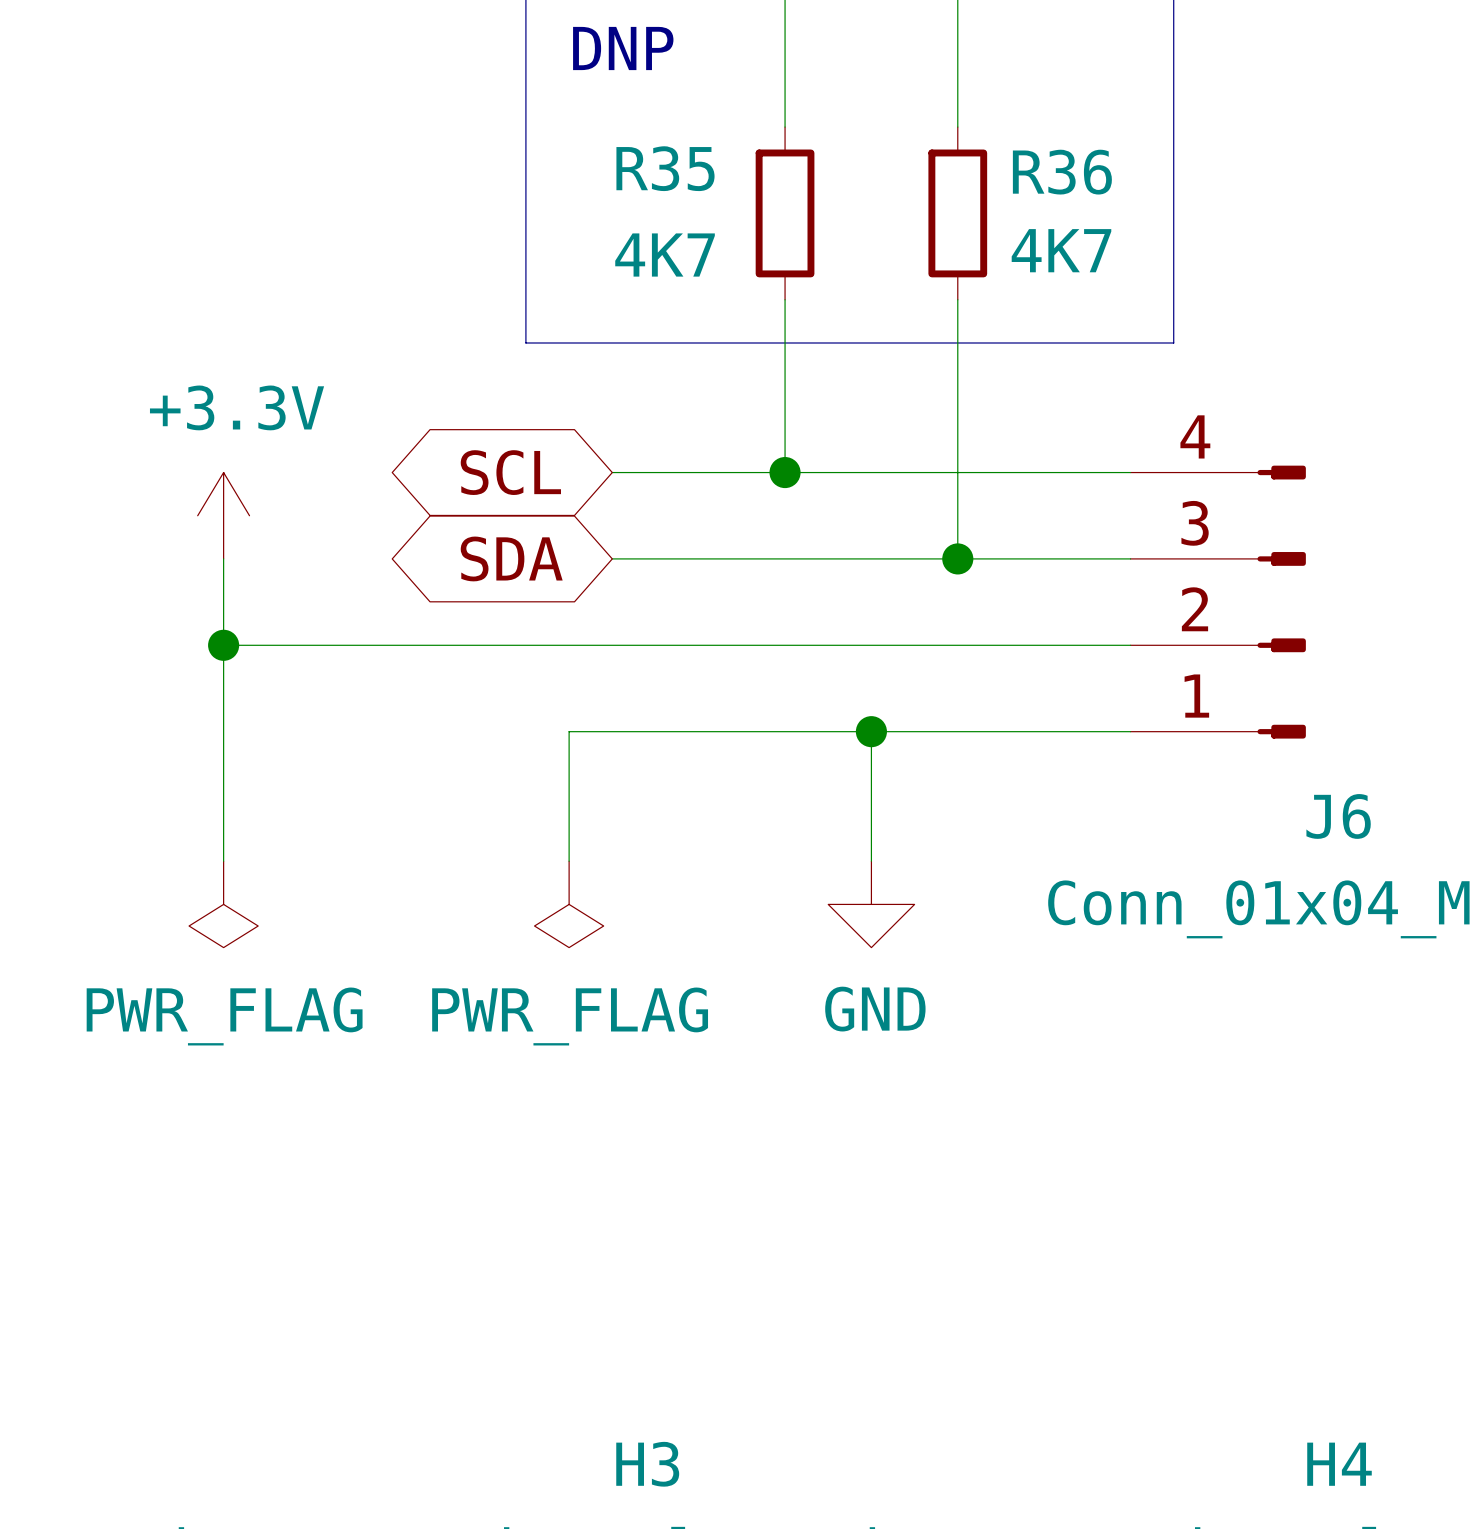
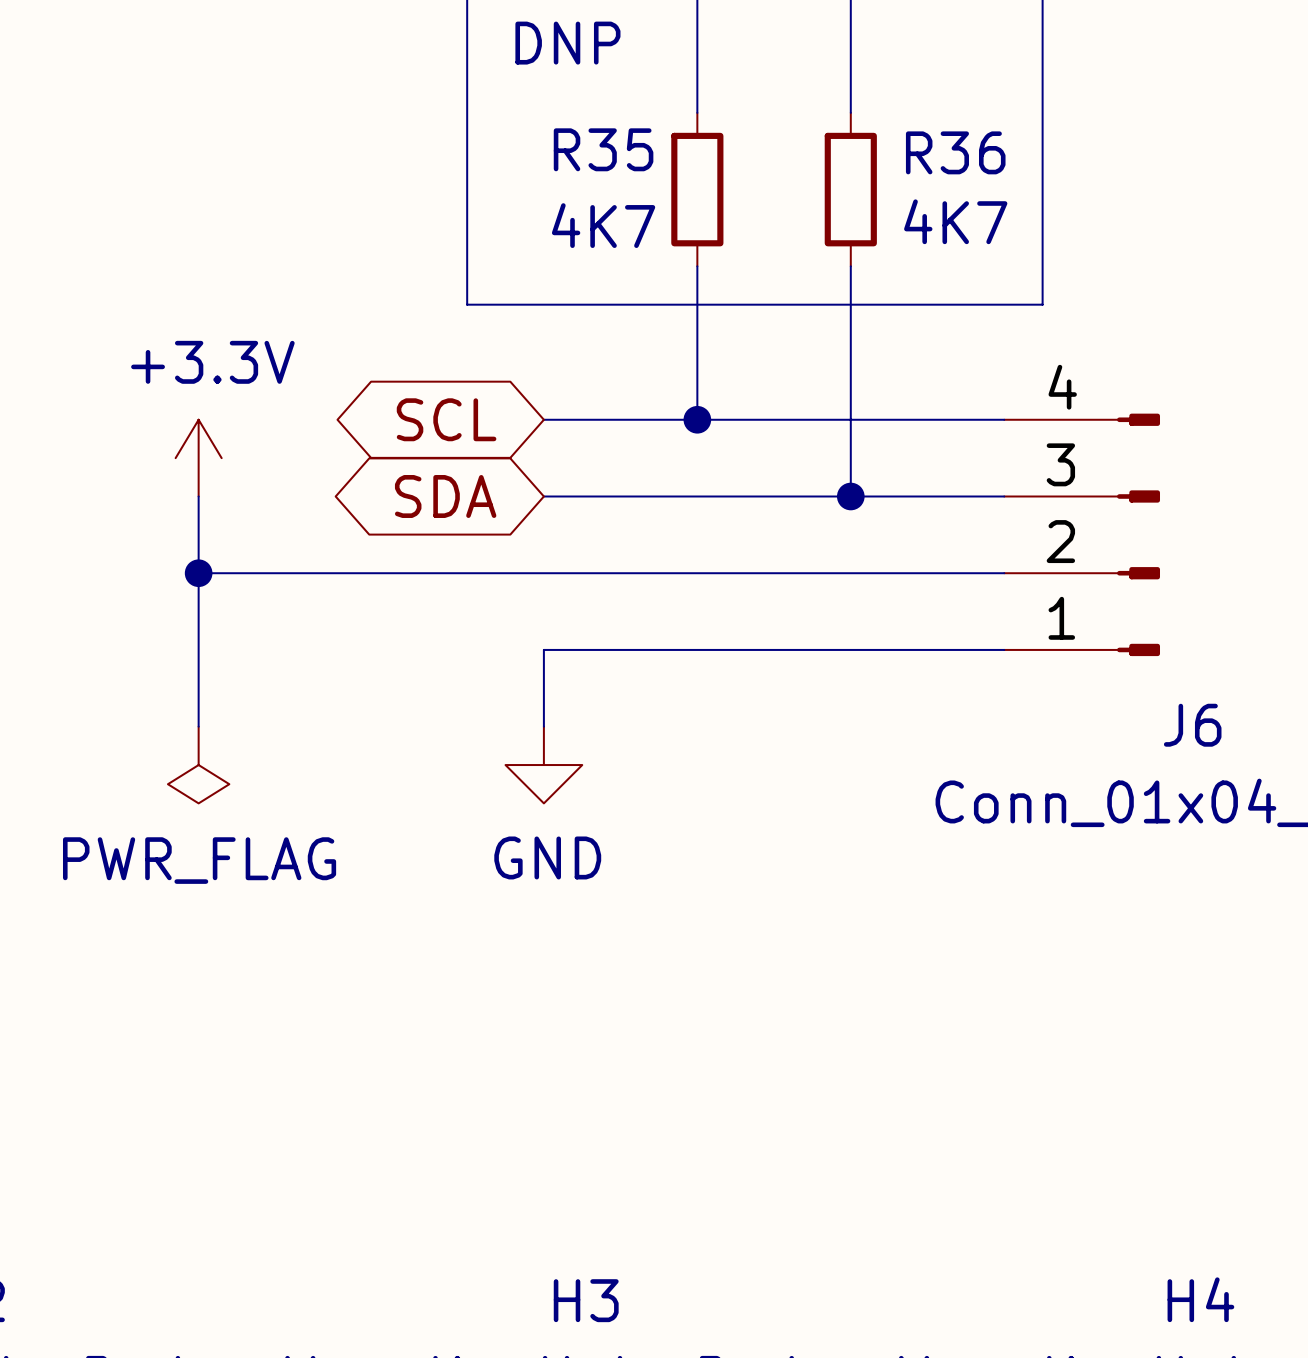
wire: (612, 731) (569, 731) (569, 861) -> (543, 649) (543, 726)
wire: (871, 731) (871, 861) -> none
junction: (871, 731) -> none
power symbol position: PWR_FLAG (223, 904) -> PWR_FLAG (198, 765)
power symbol: PWR_FLAG (569, 904) -> none
power symbol position: GND (871, 904) -> GND (543, 765)

